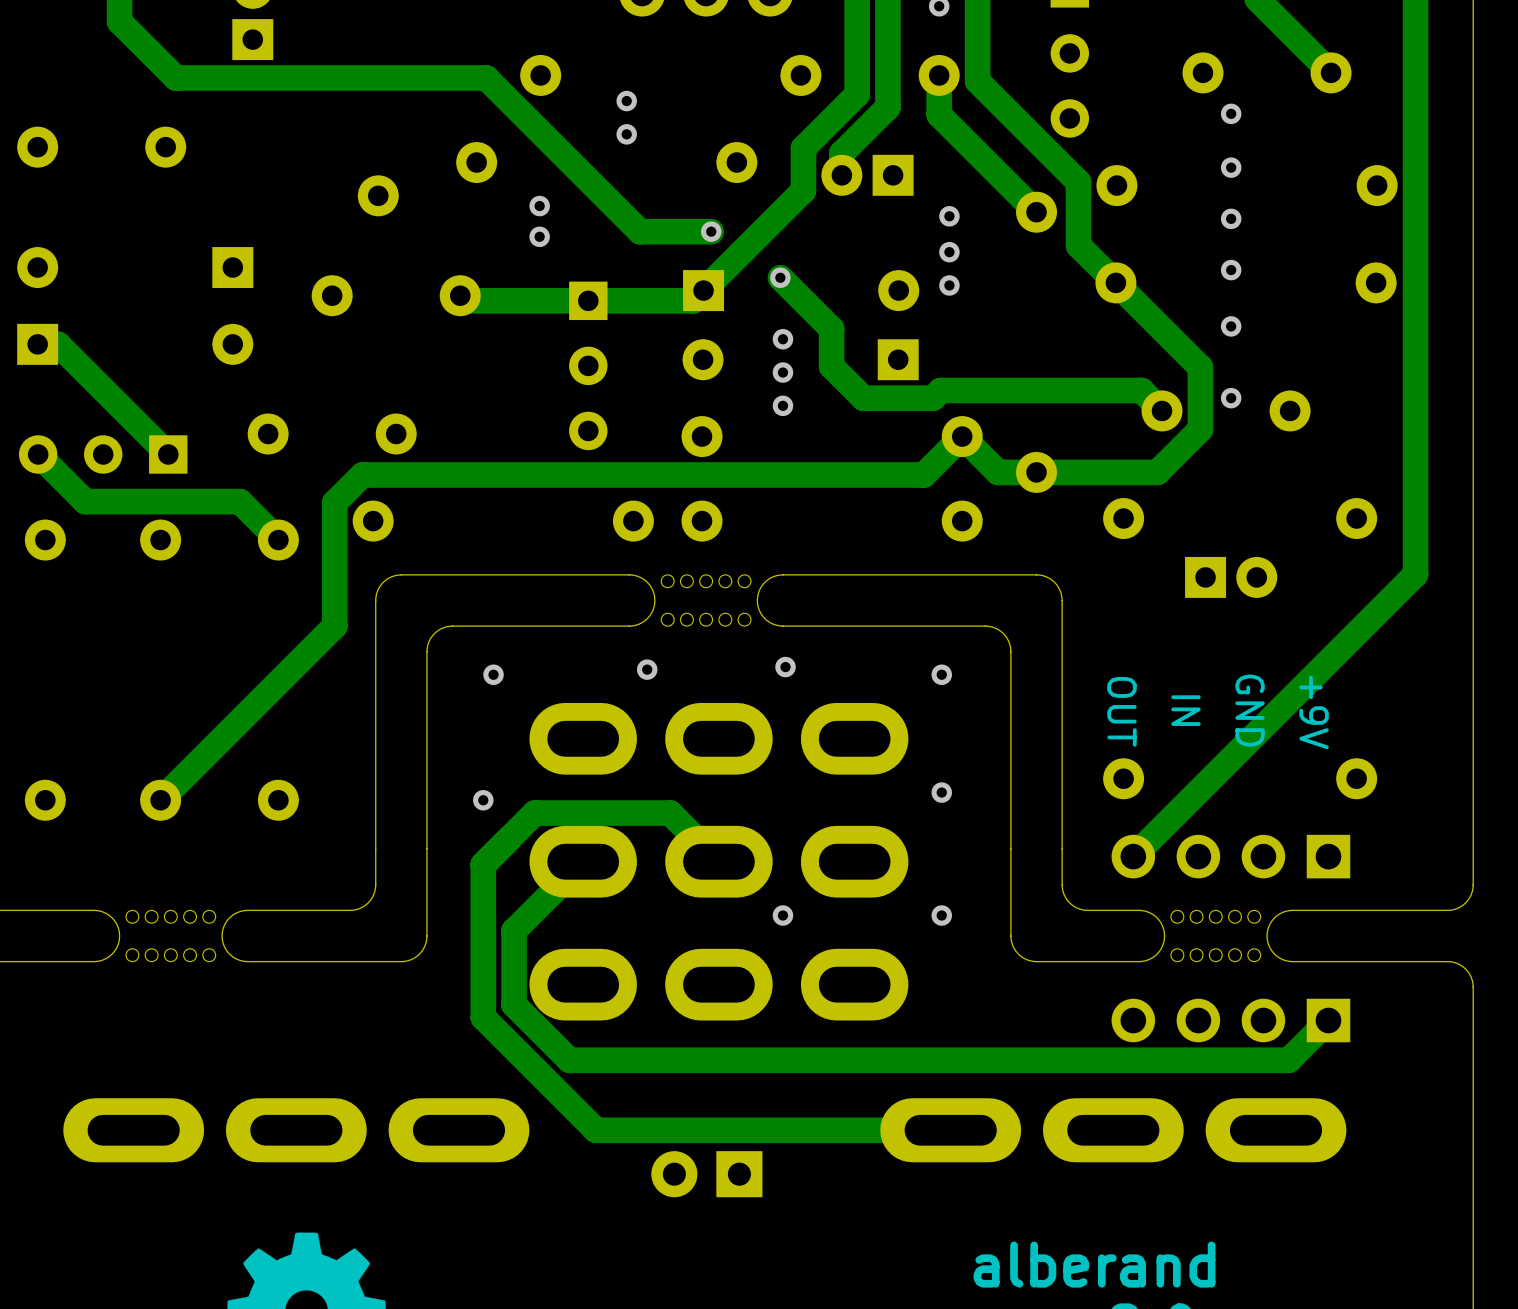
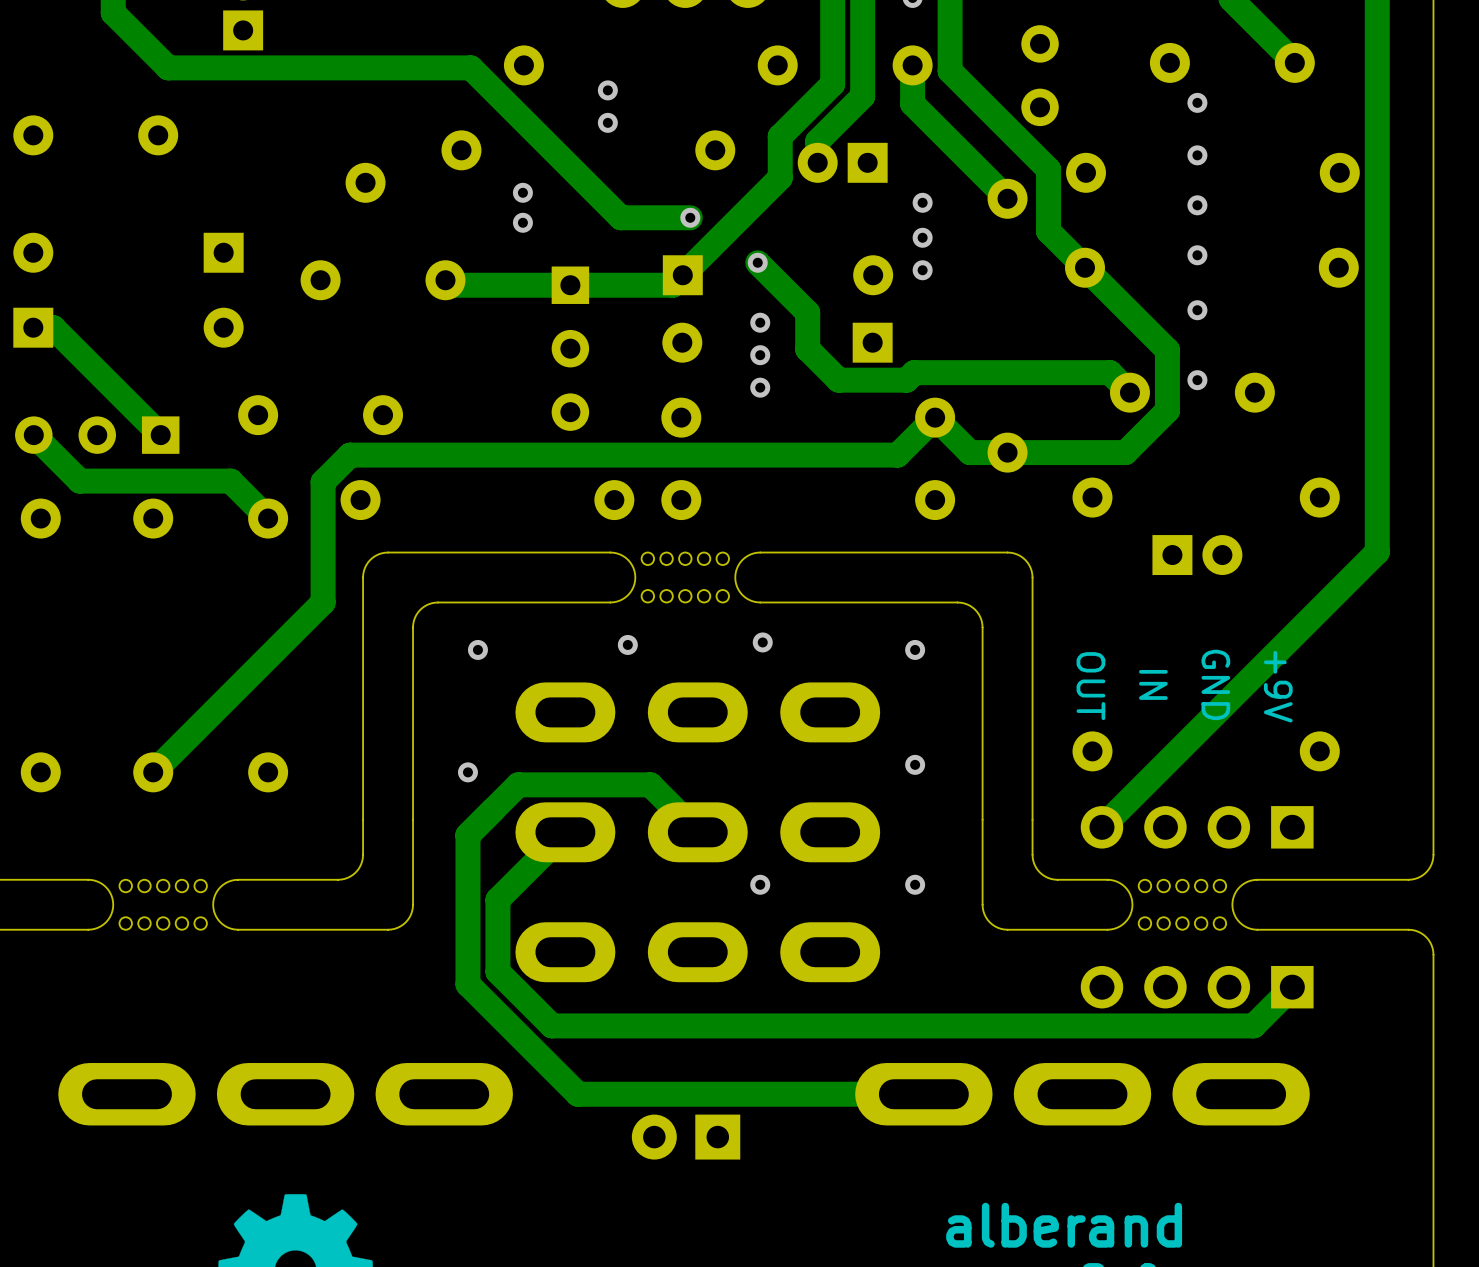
part footprint: [529, 702, 909, 1021] -> [515, 682, 881, 983]

